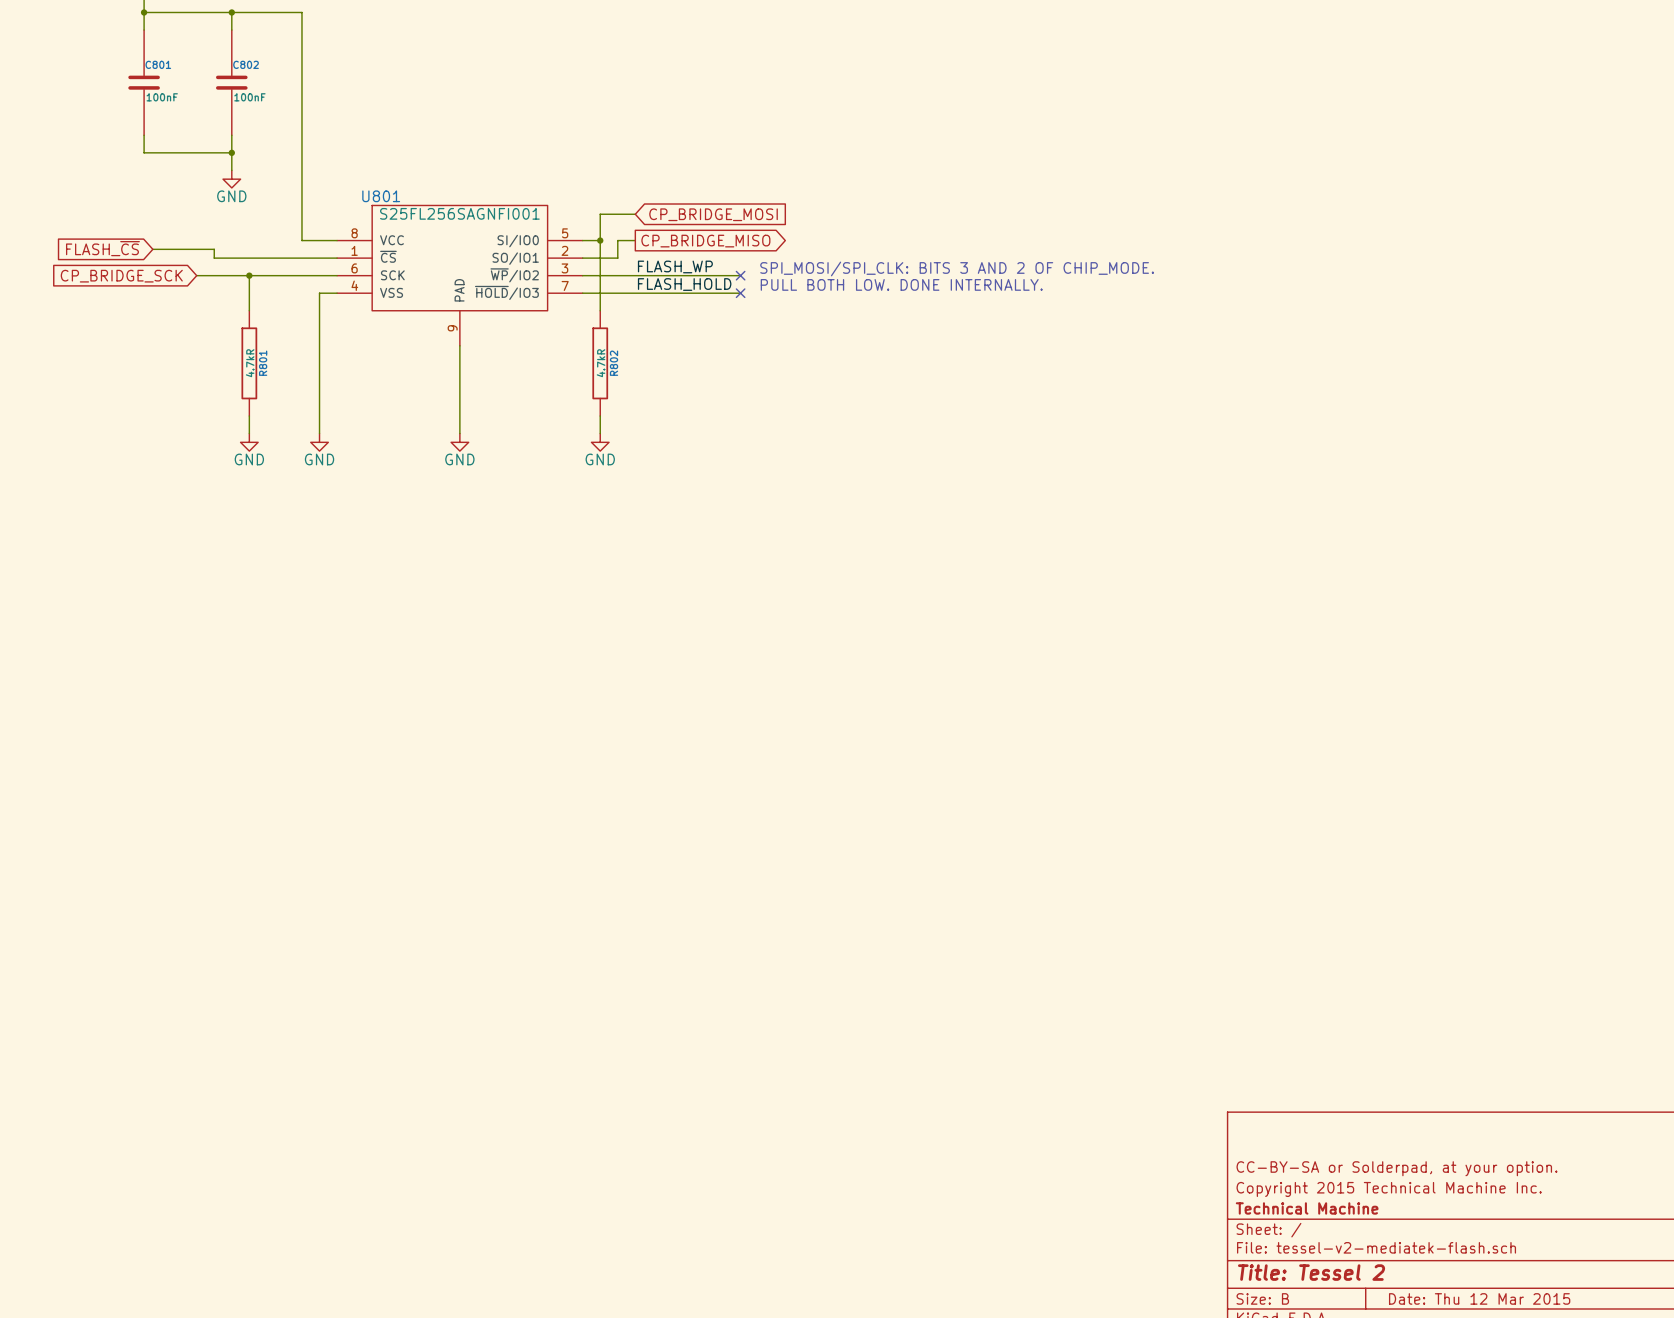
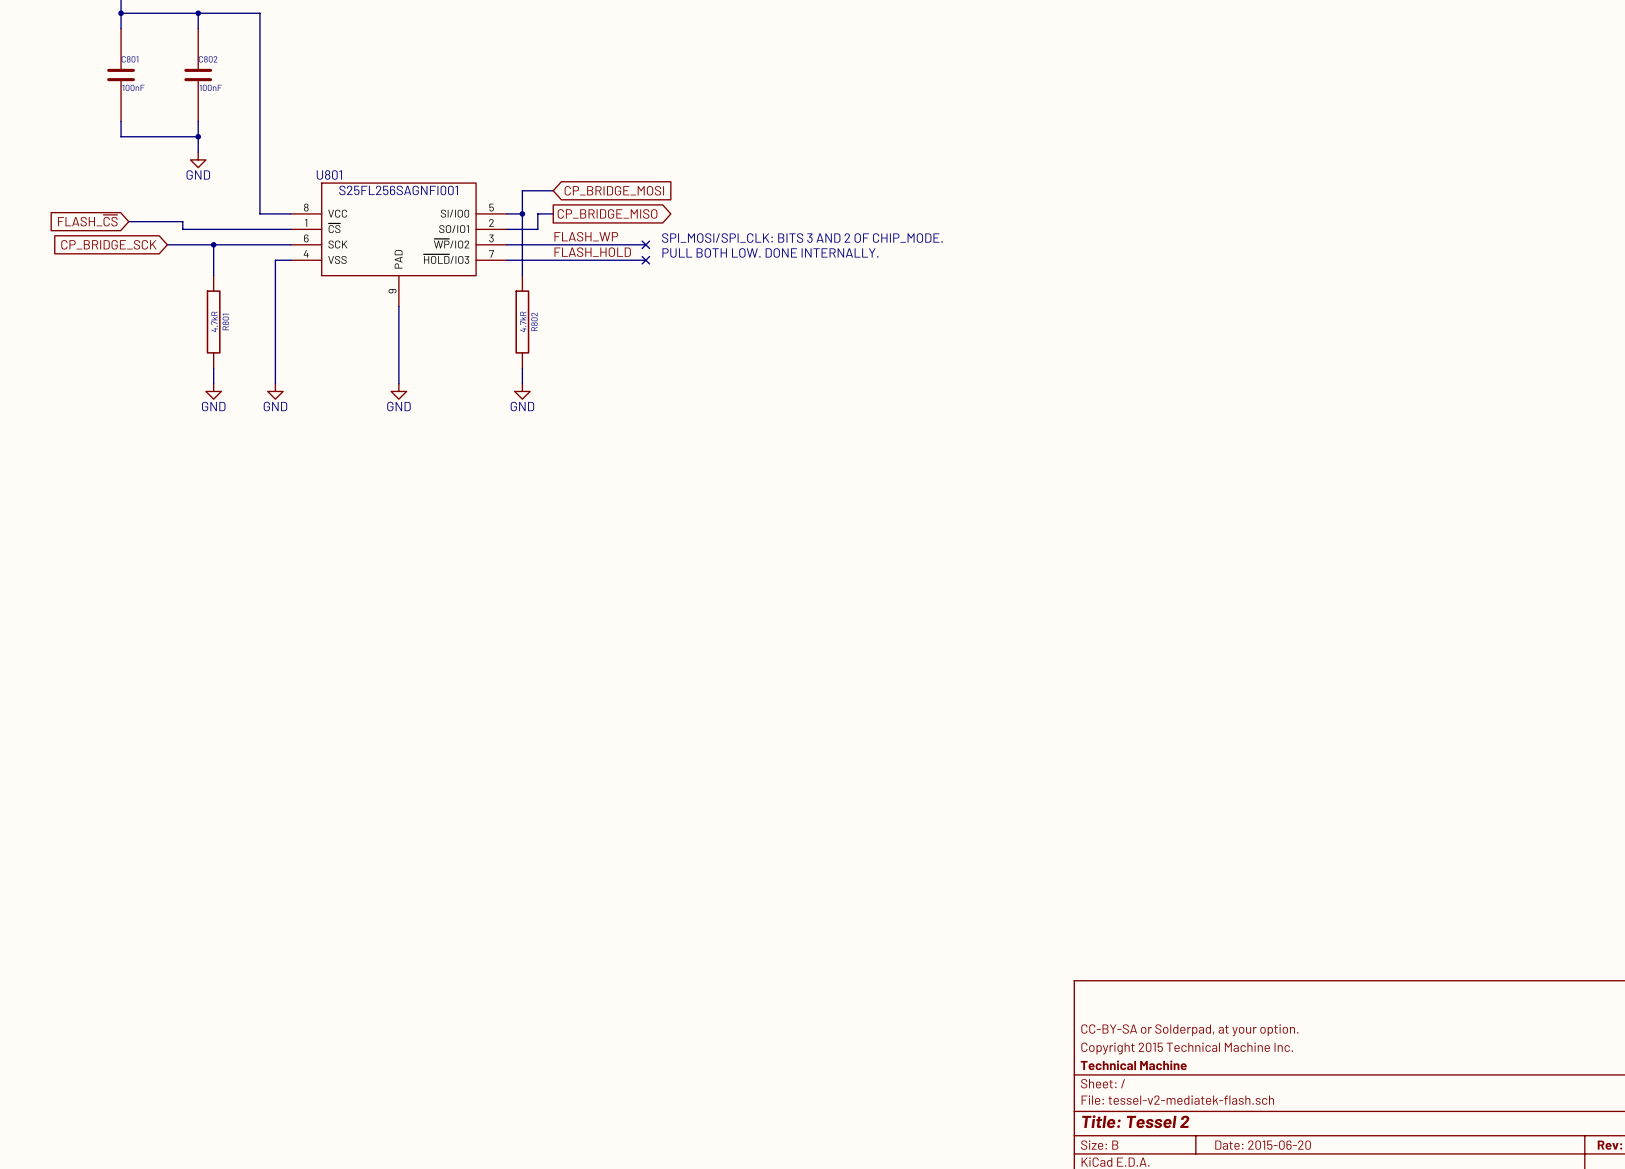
title block: Date: Thu 12 Mar 2015 (1479, 1298) -> Date: 2015-06-20 (1263, 1145)

